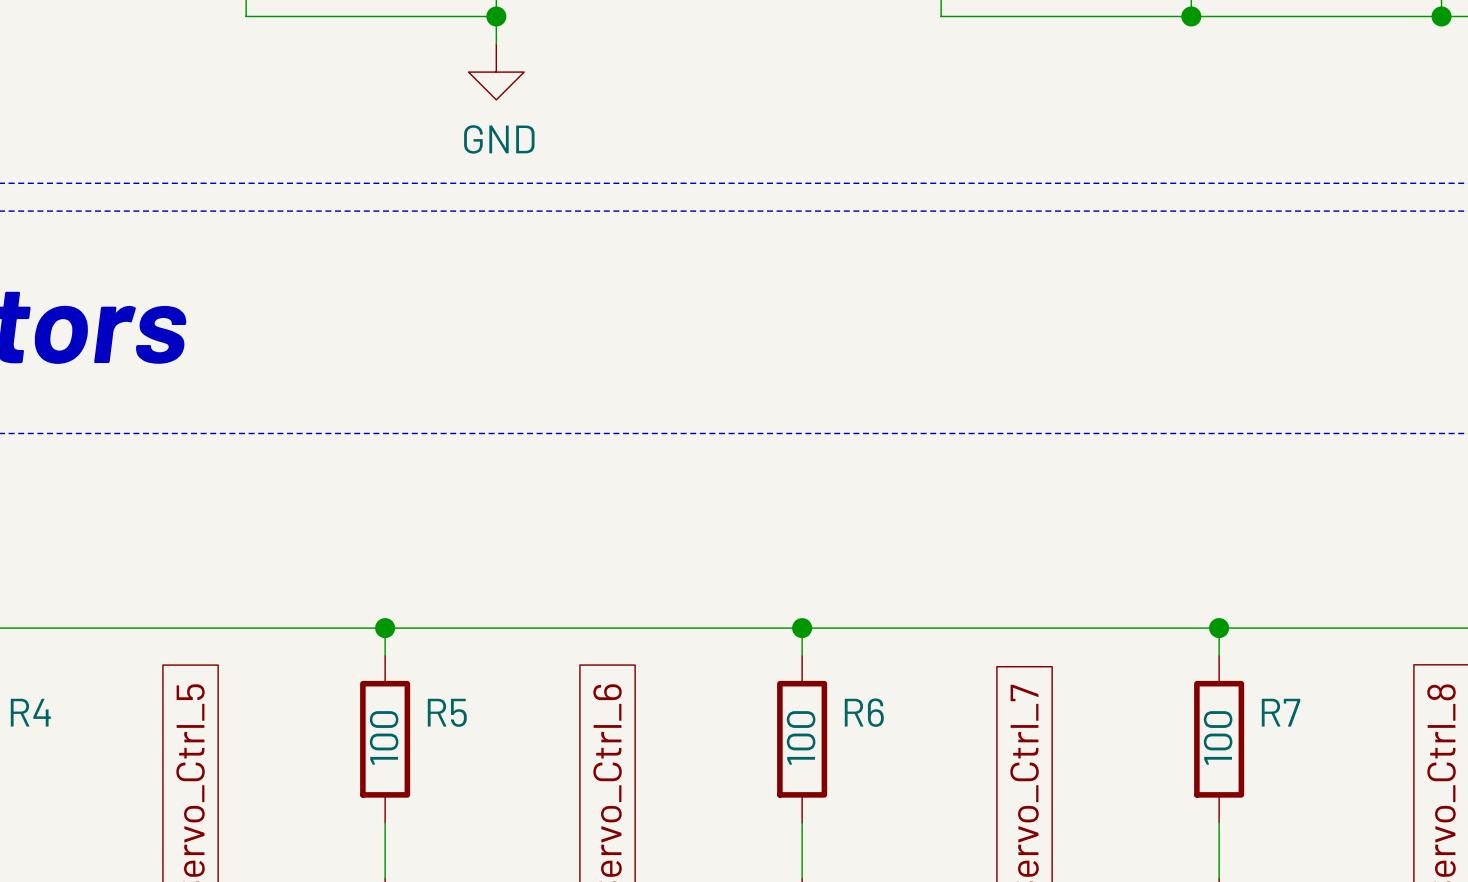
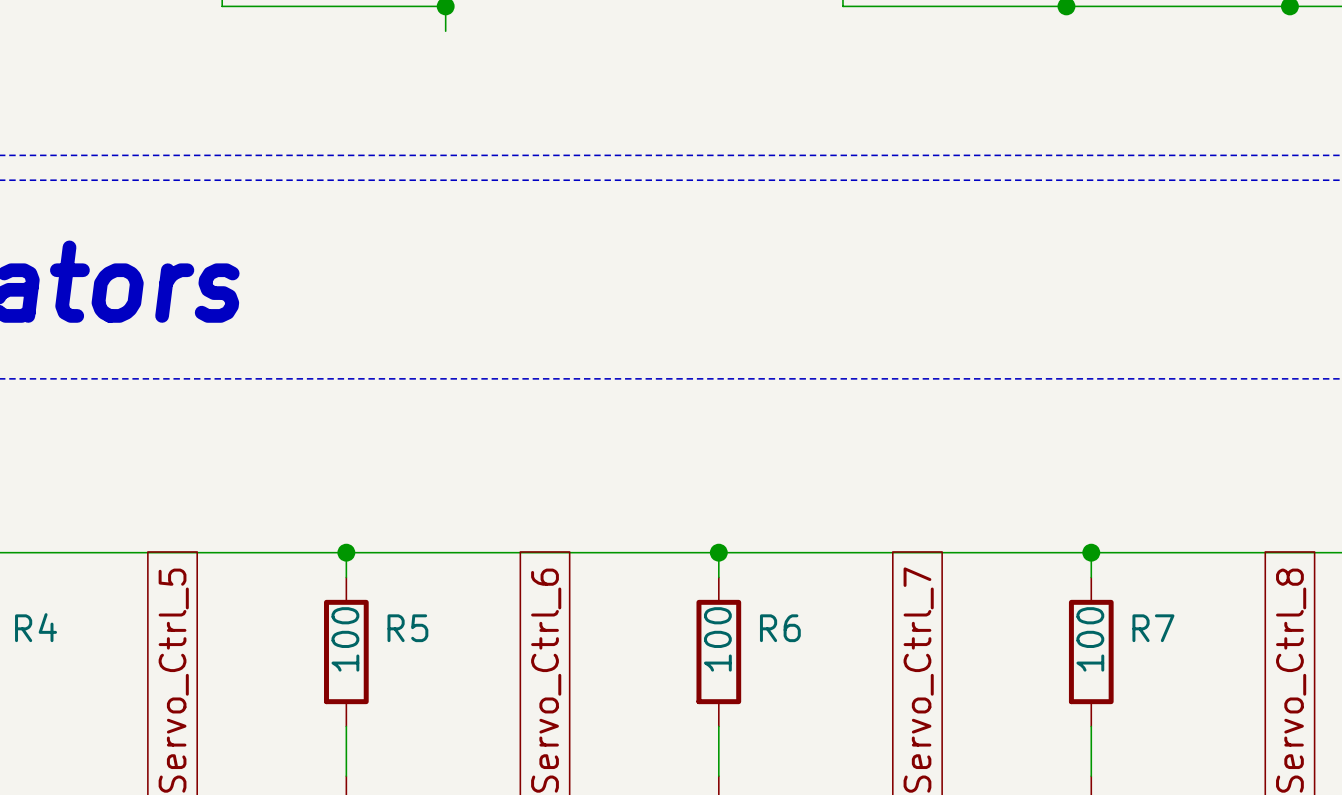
power symbol: GND (496, 72) -> none

